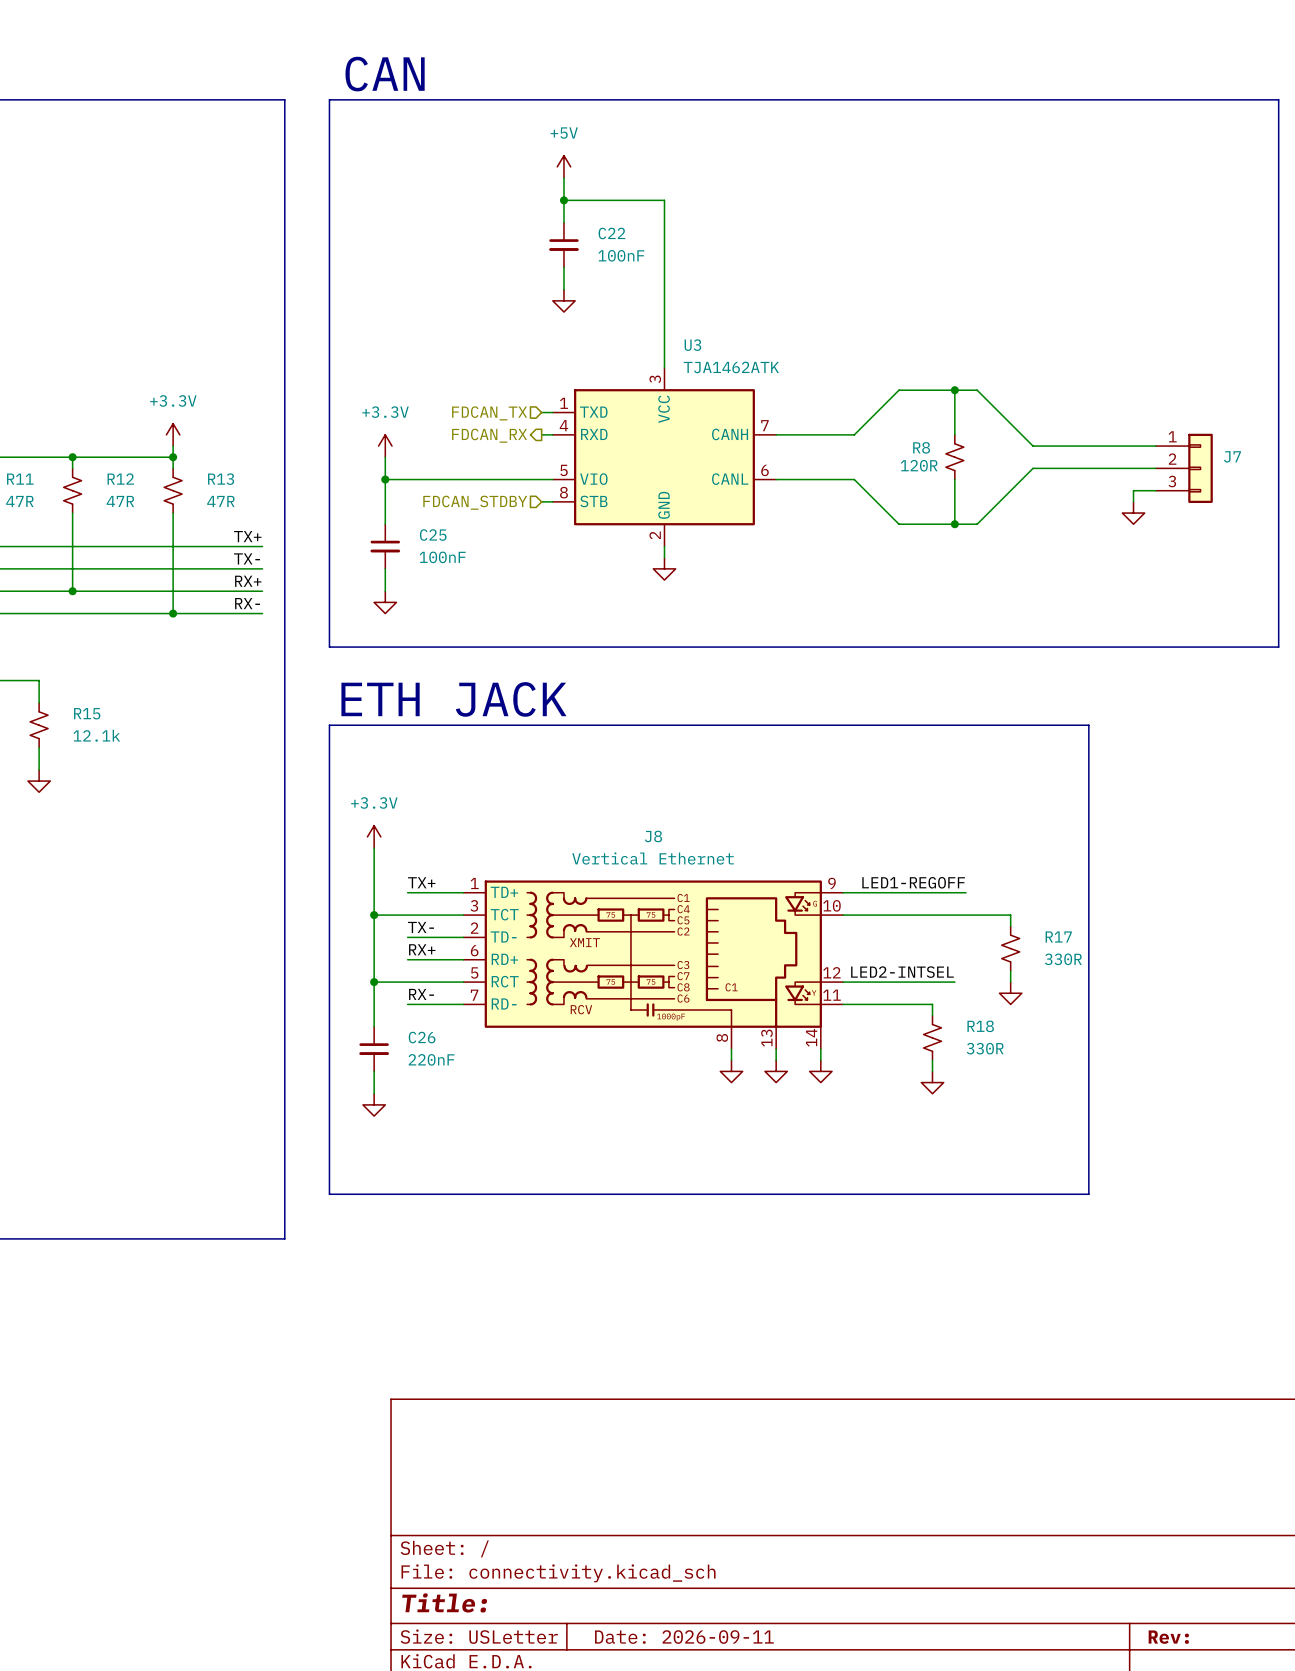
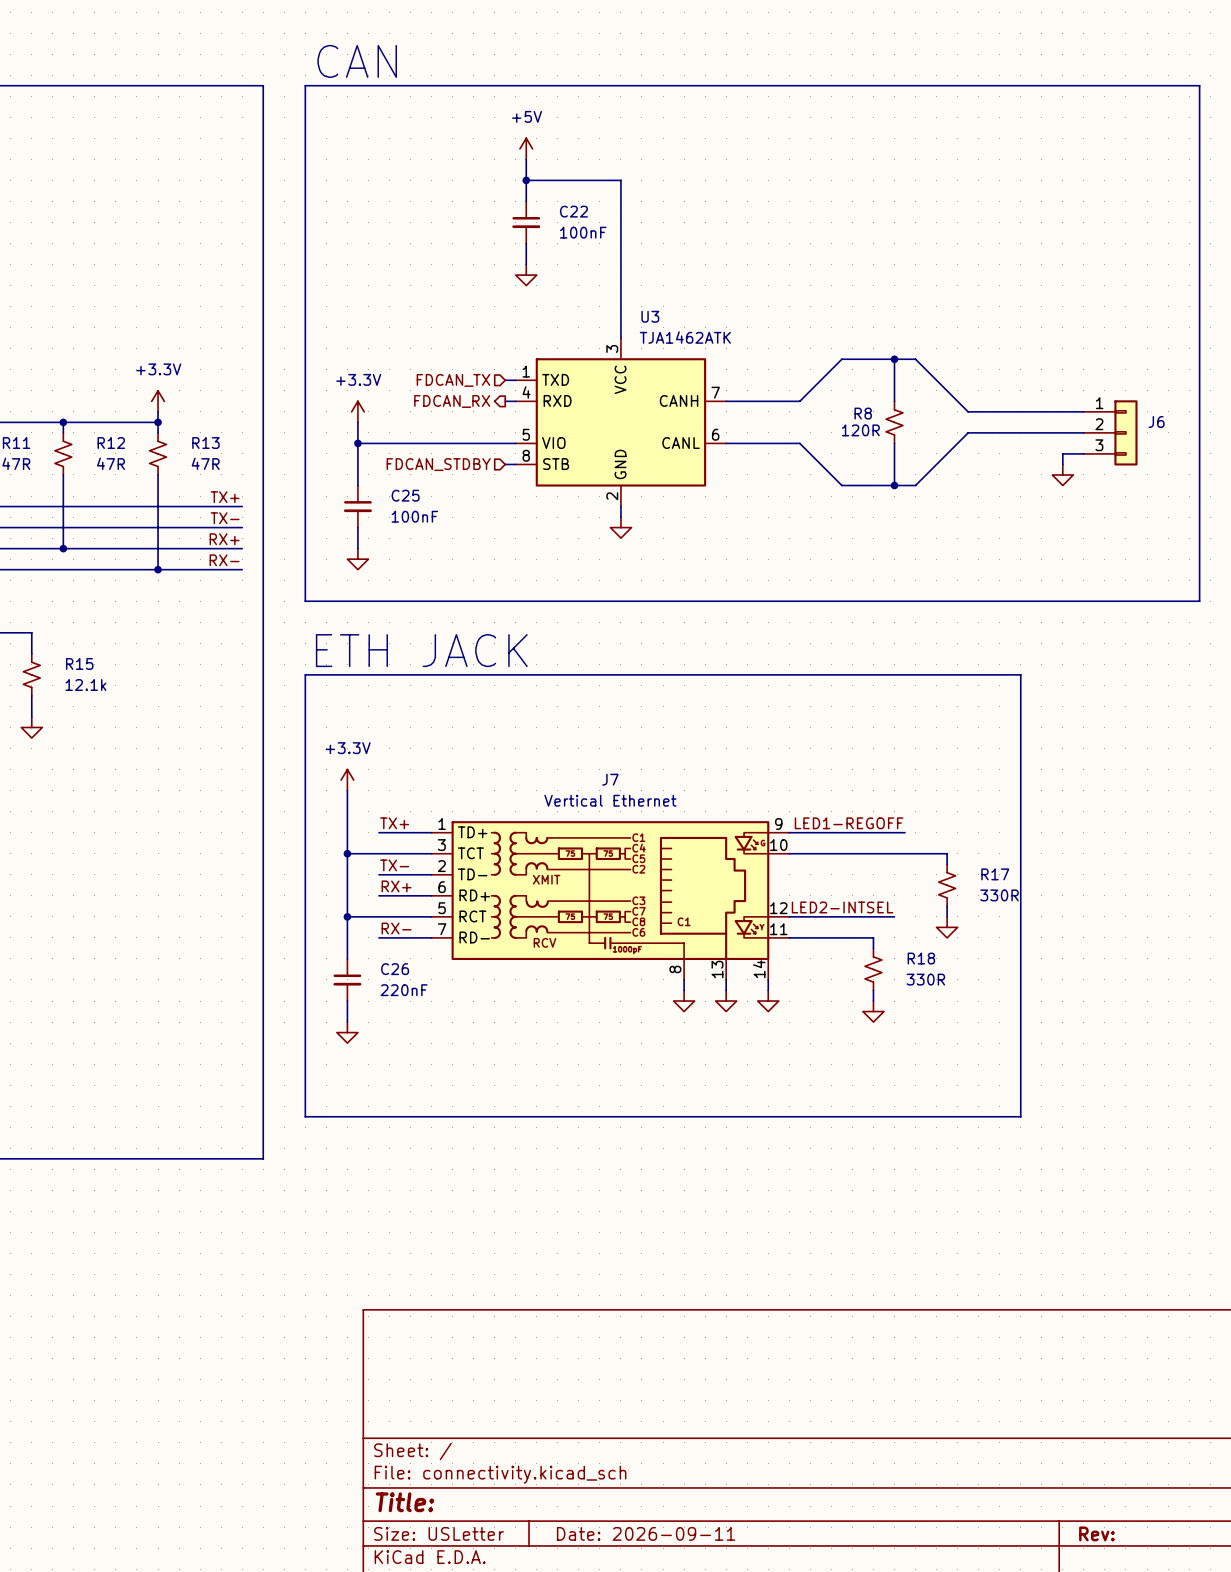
J7 name: J7 (1232, 456) -> J6 (1156, 421)
J8 name: J8 (653, 836) -> J7 (610, 779)

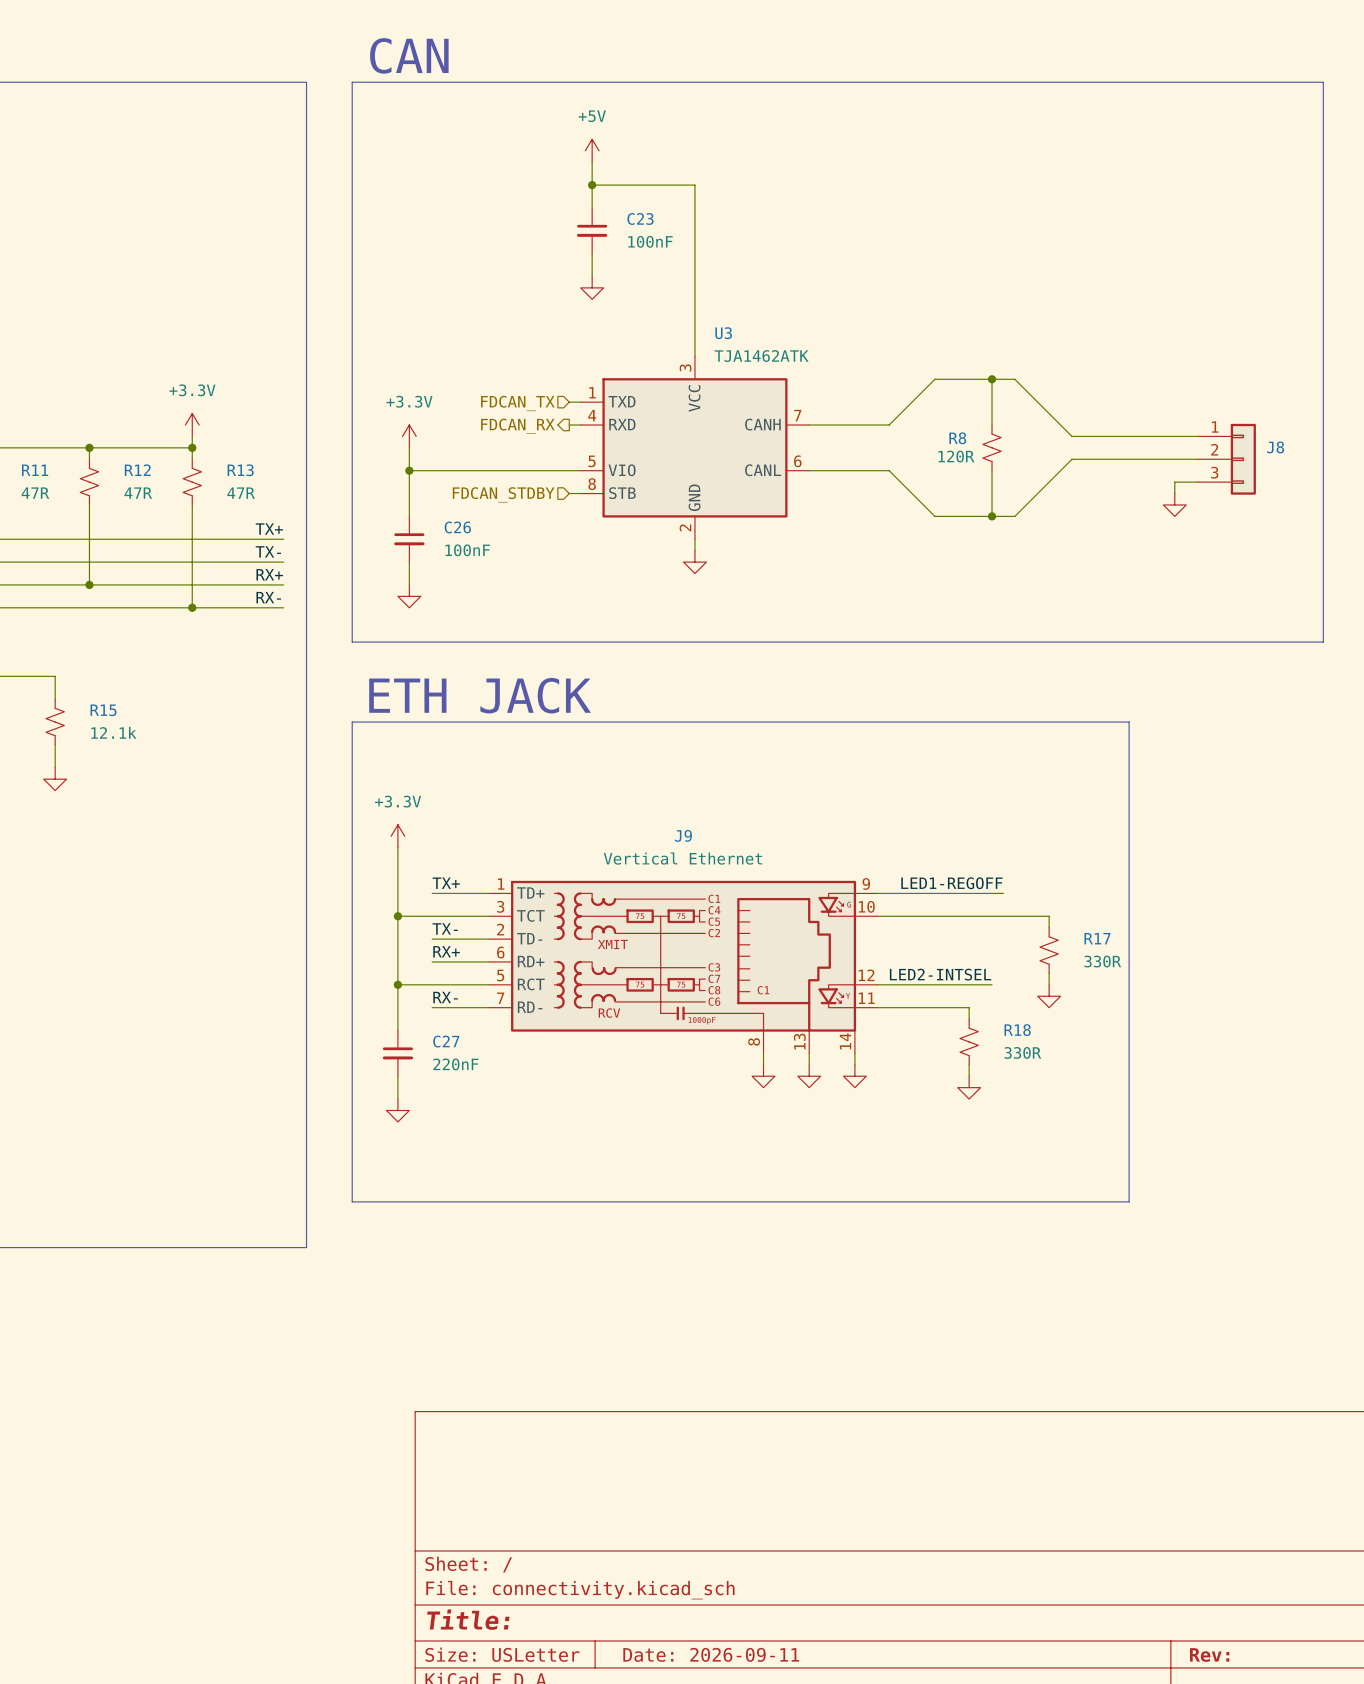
C22 name: C22 (573, 211) -> C23 (640, 218)
J6 name: J6 (1156, 421) -> J8 (1275, 447)
C25 name: C25 (405, 495) -> C26 (457, 527)
J7 name: J7 (610, 779) -> J9 (683, 835)
C26 name: C26 (395, 969) -> C27 (446, 1041)

